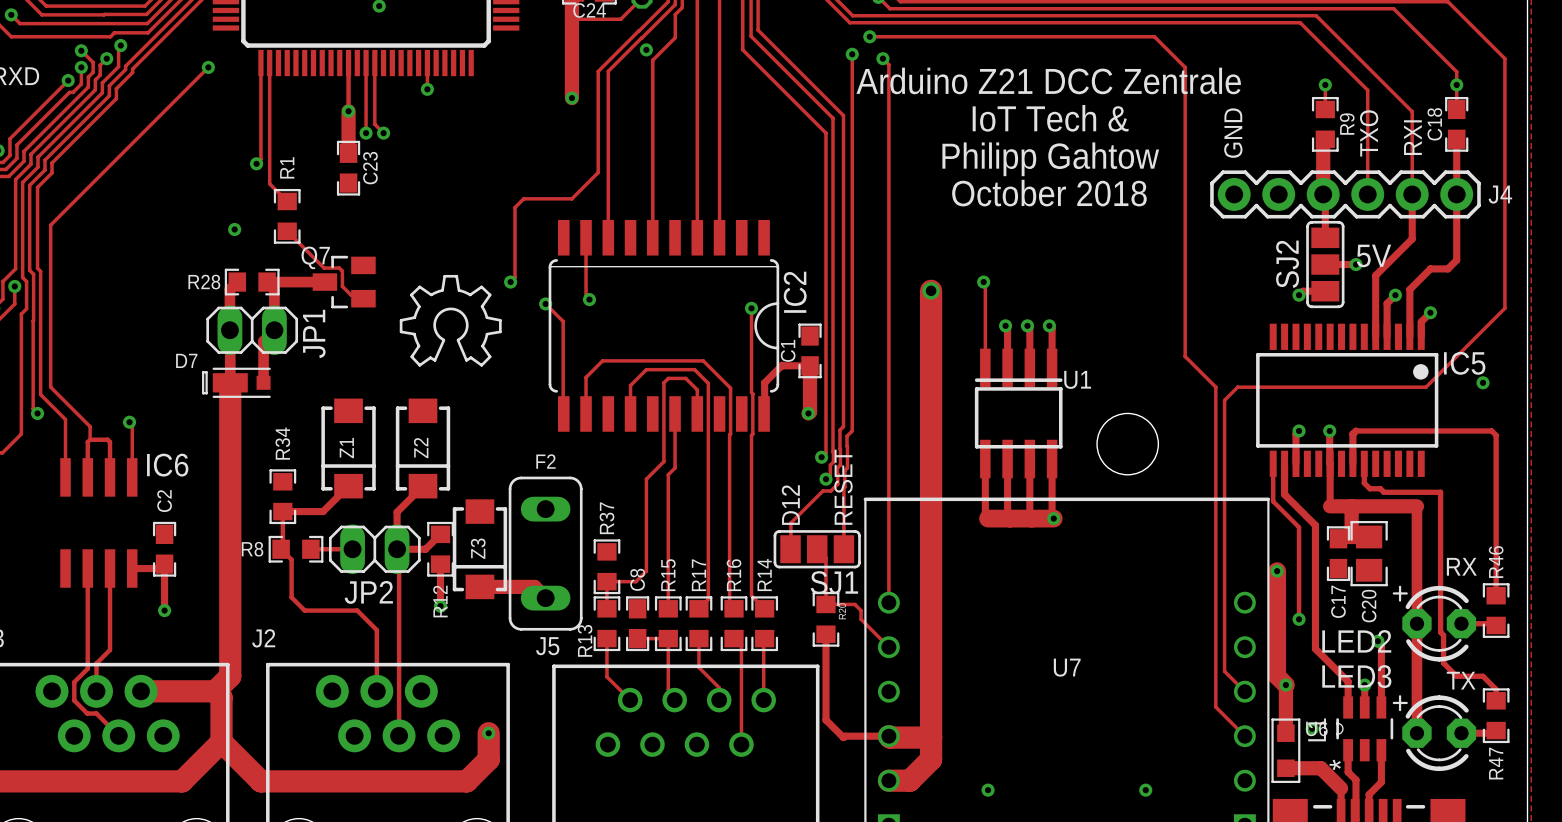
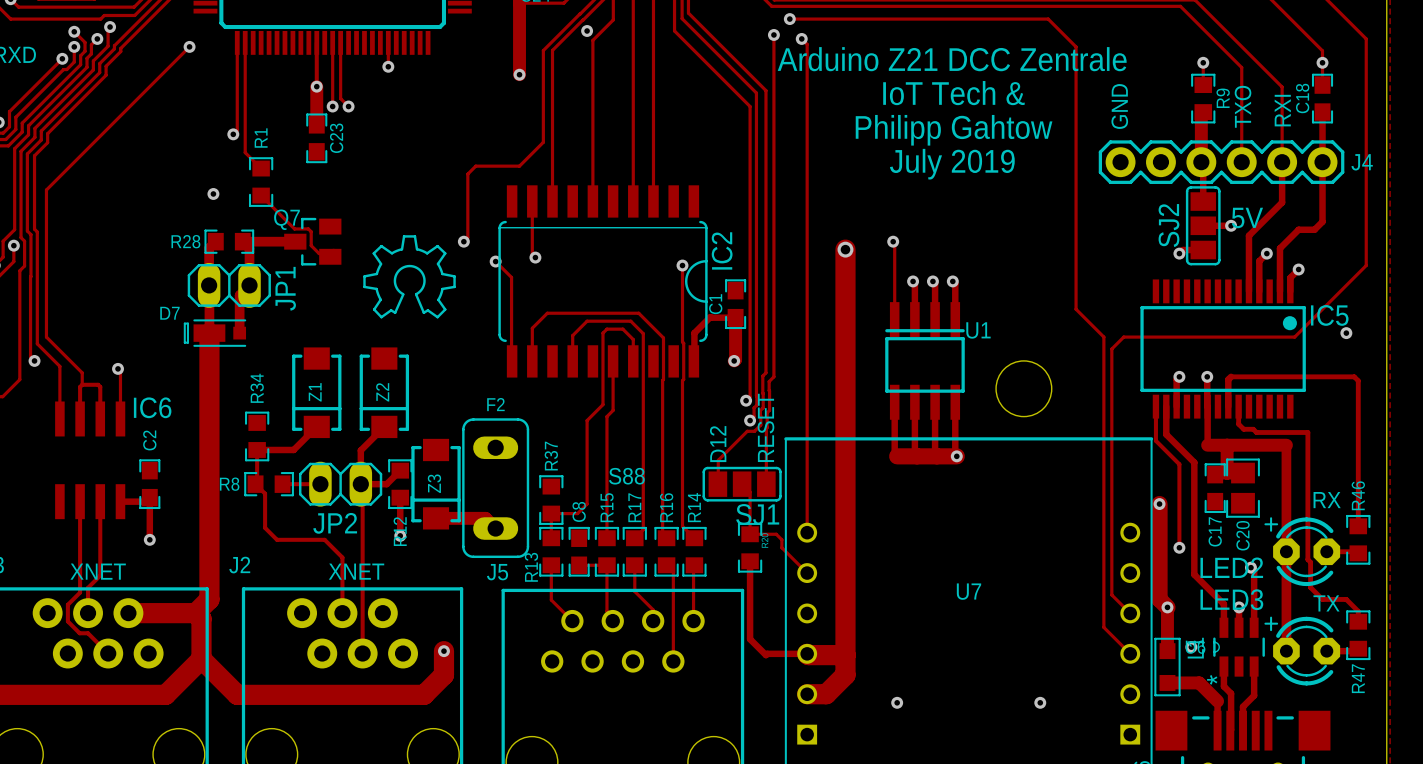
text: October 2018 (1049, 193) -> July 2019 (952, 164)
text: none -> S88 (626, 476)
text: none -> XNET (98, 571)
text: none -> XNET (356, 571)

